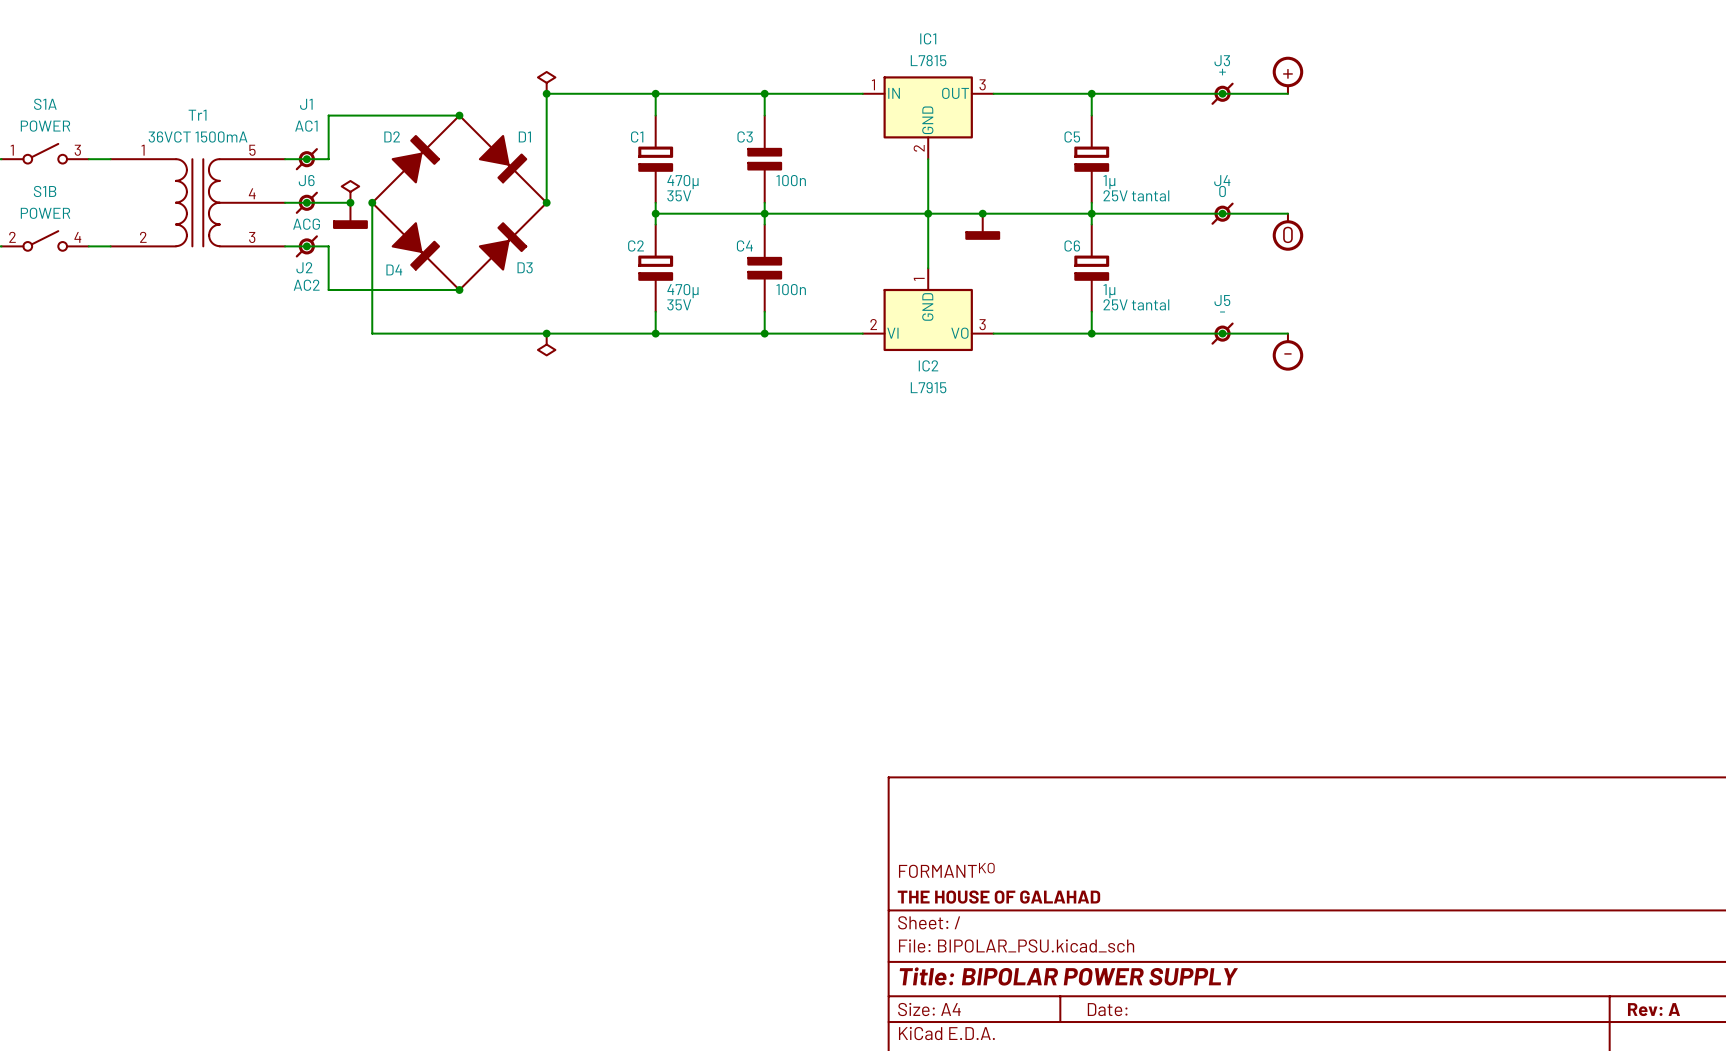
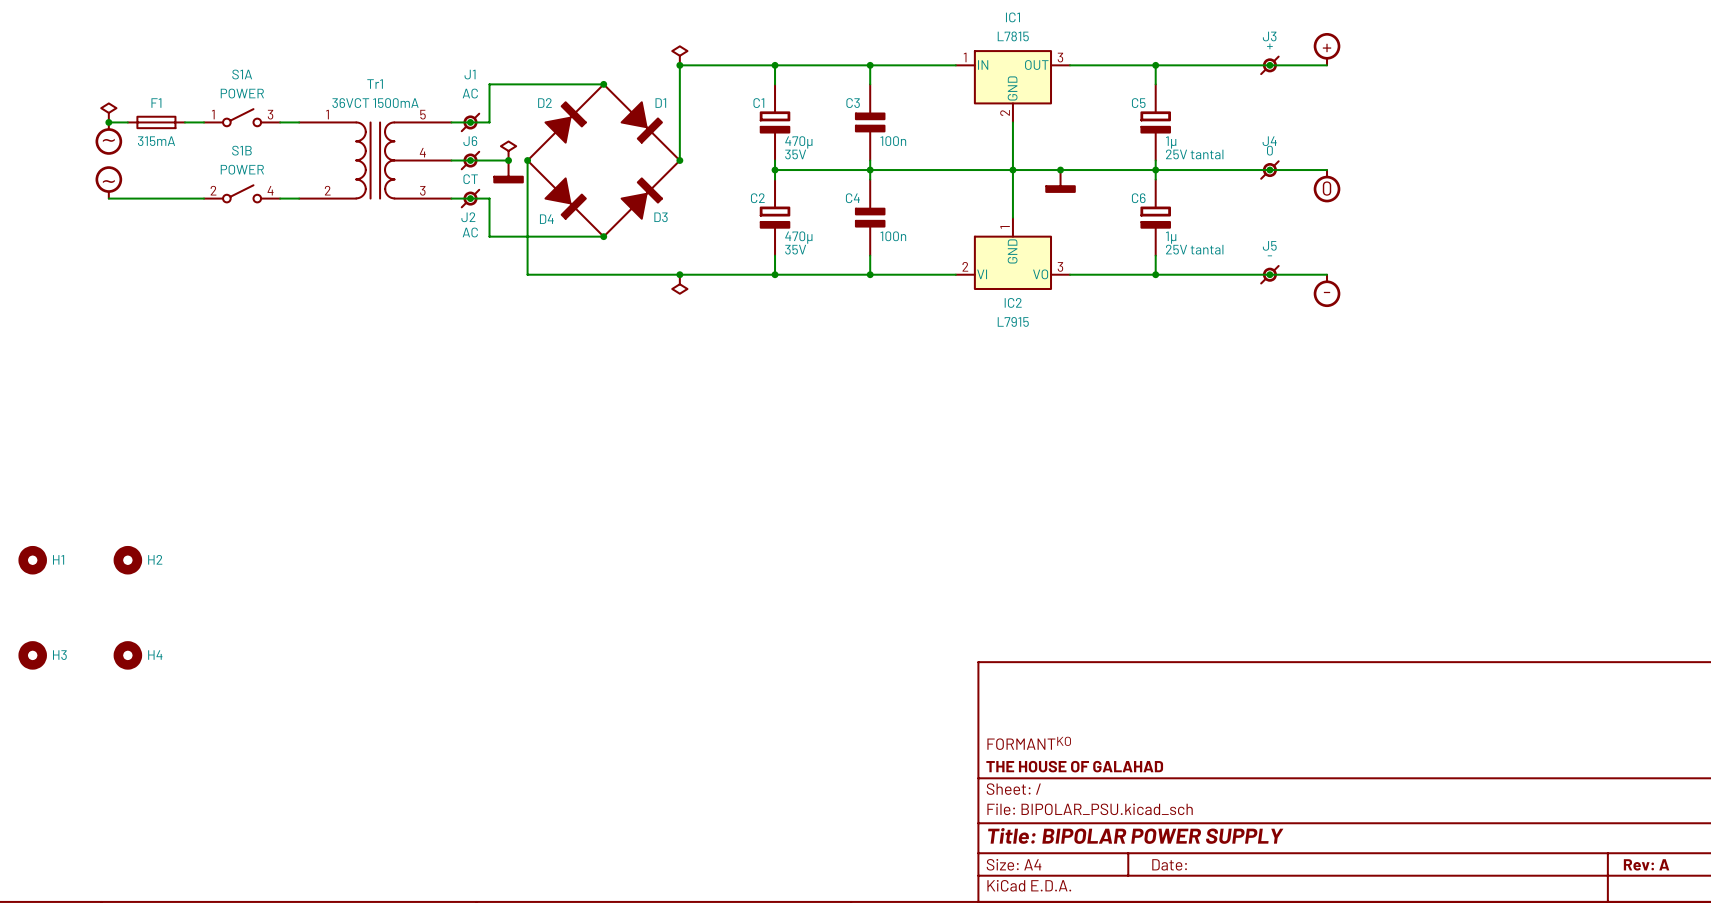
J1 value: AC1 (306, 126) -> AC (470, 93)
J6 value: ACG (306, 224) -> CT (470, 179)
J2 value: AC2 (306, 285) -> AC (470, 232)

